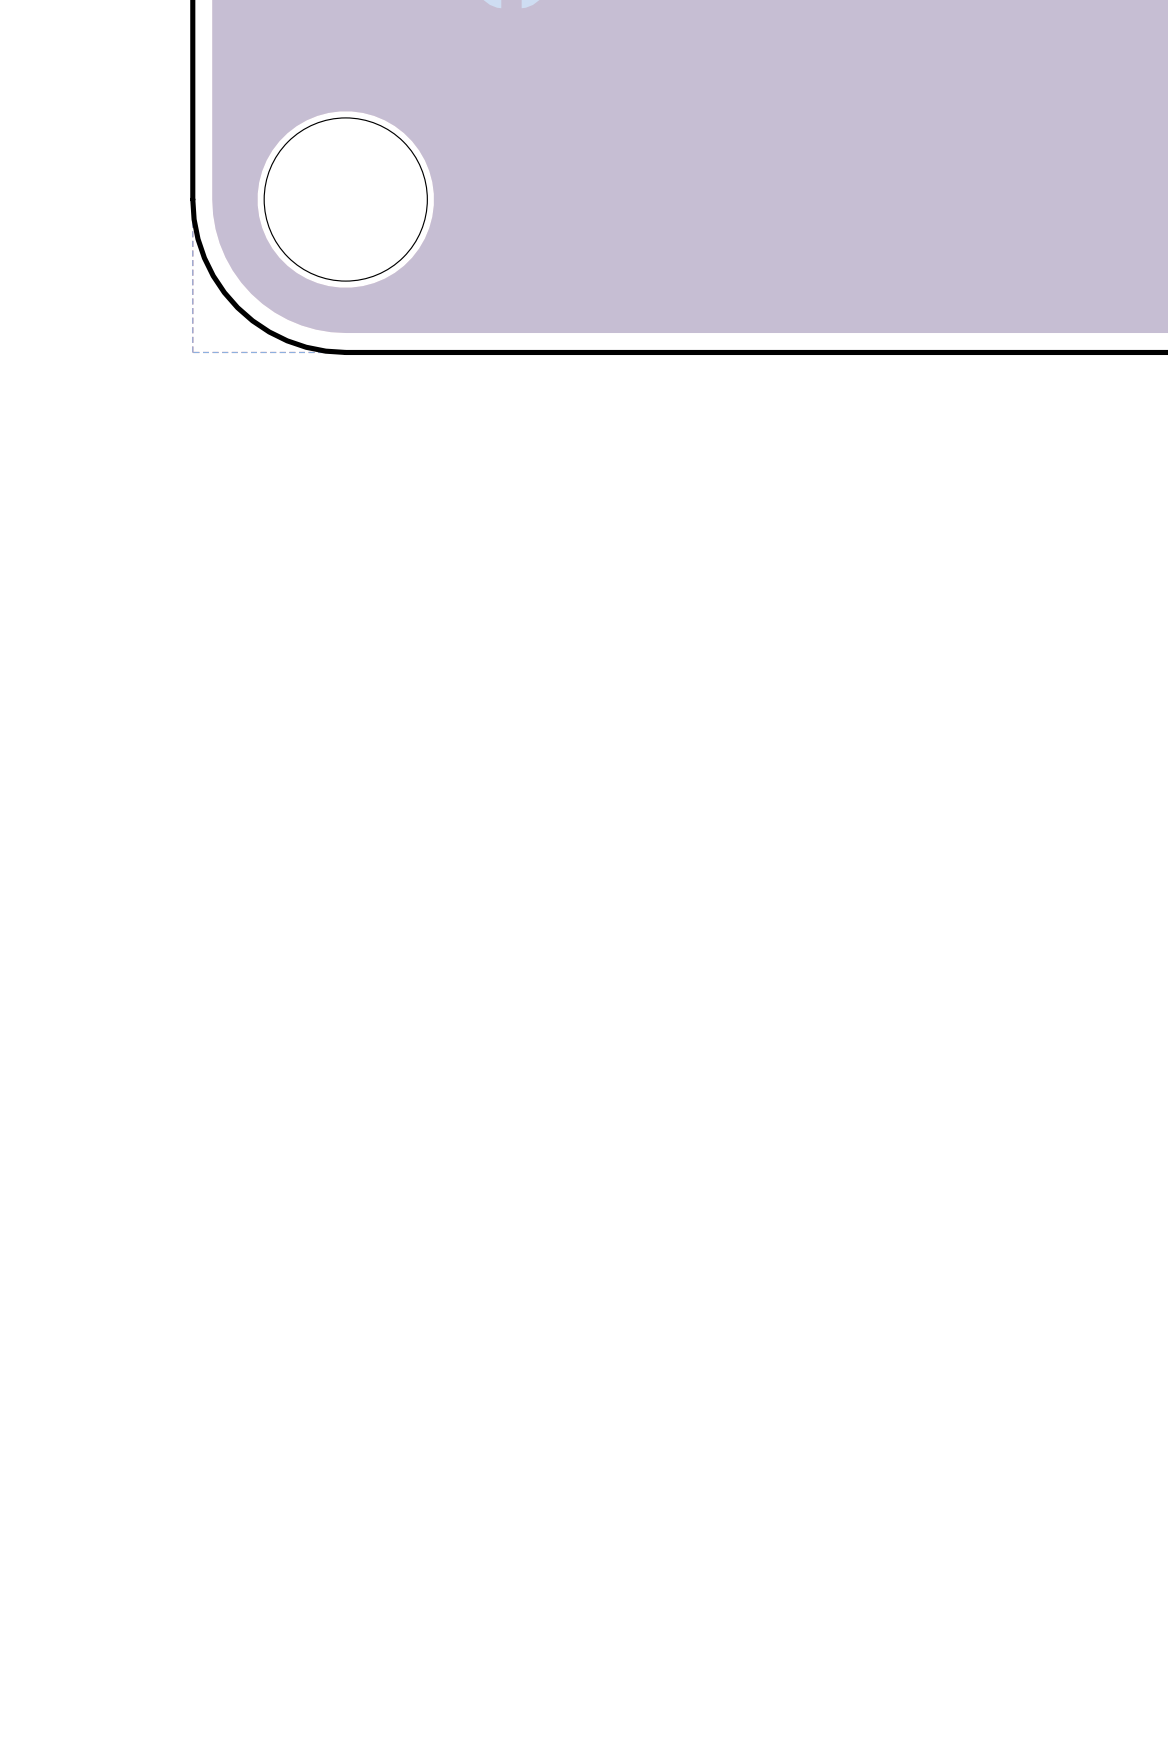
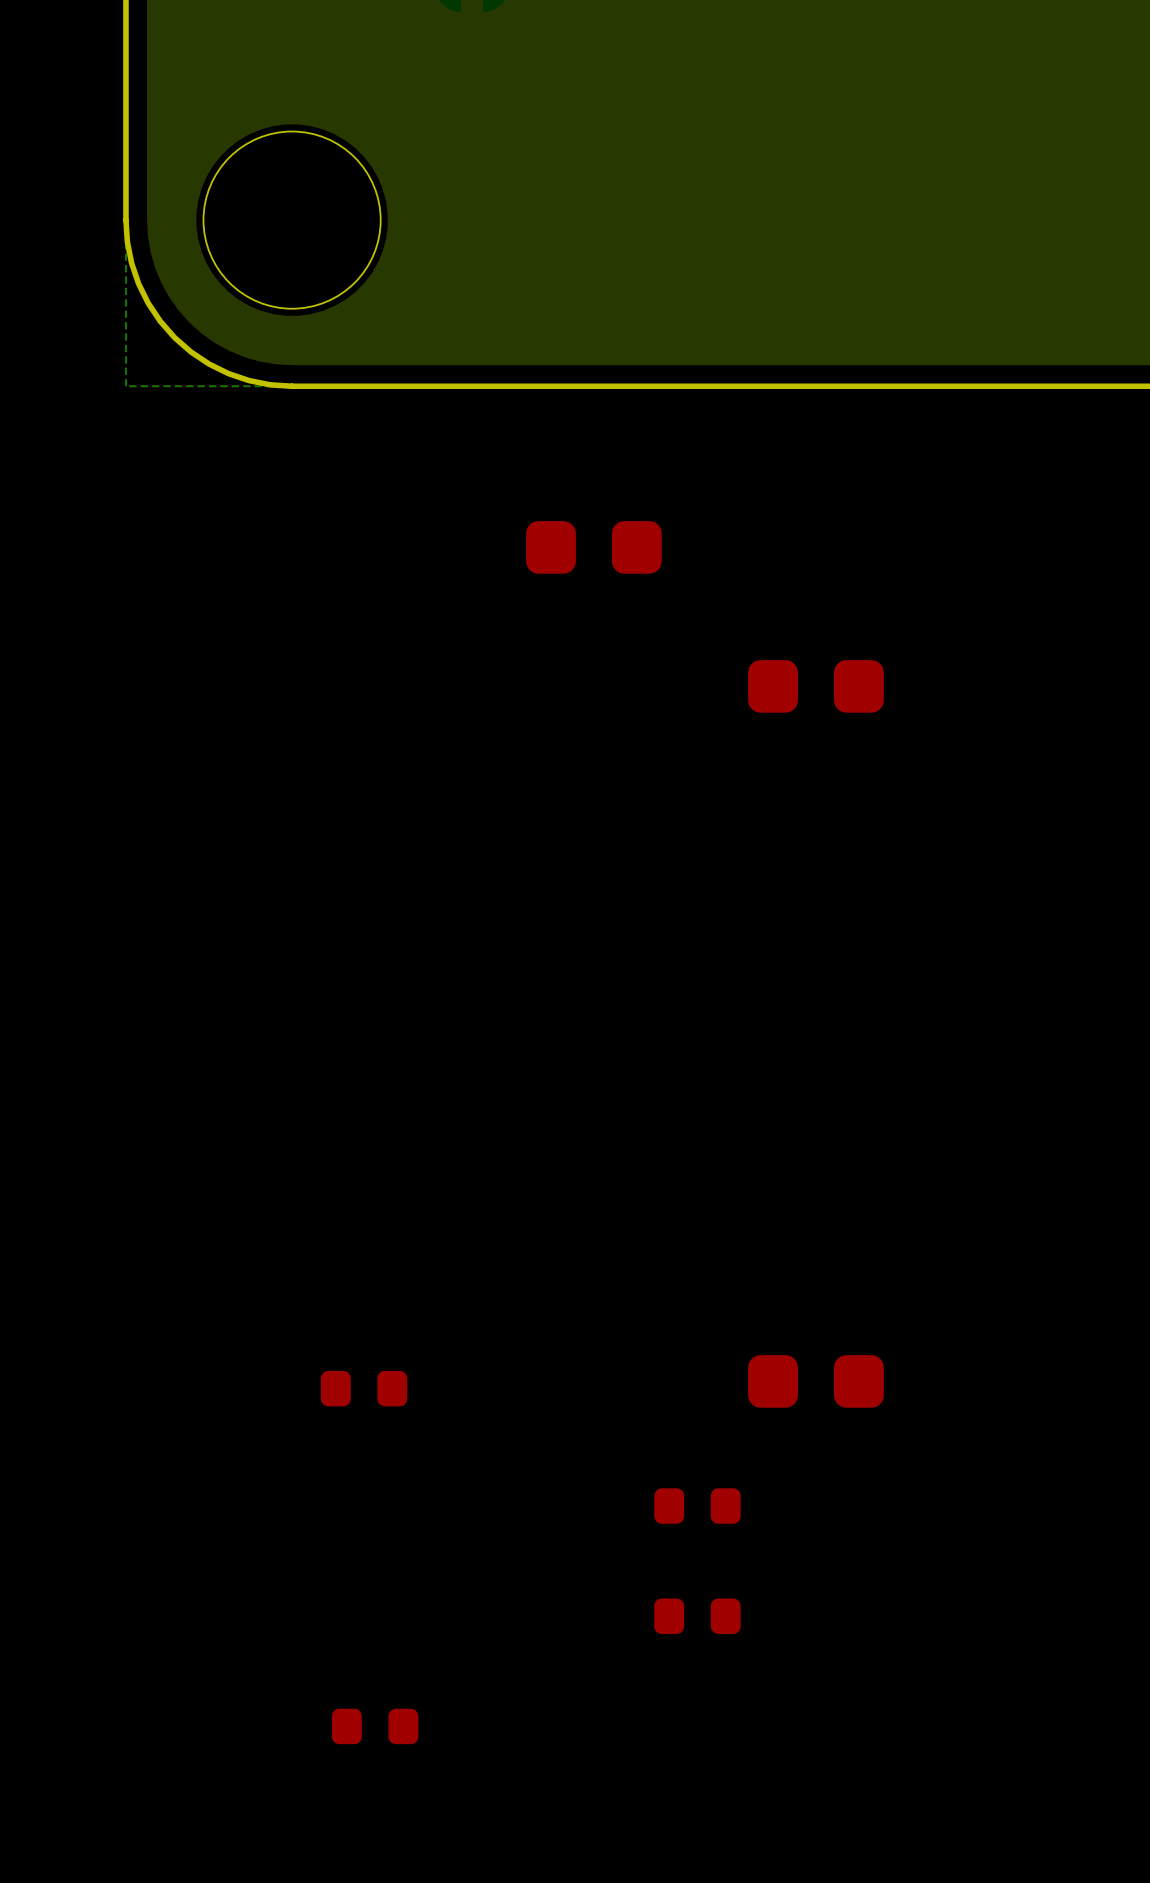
part: none -> (593, 547)
part: none -> (815, 686)
part: none -> (815, 1381)
part: none -> (364, 1388)
part: none -> (697, 1506)
part: none -> (697, 1616)
part: none -> (375, 1726)

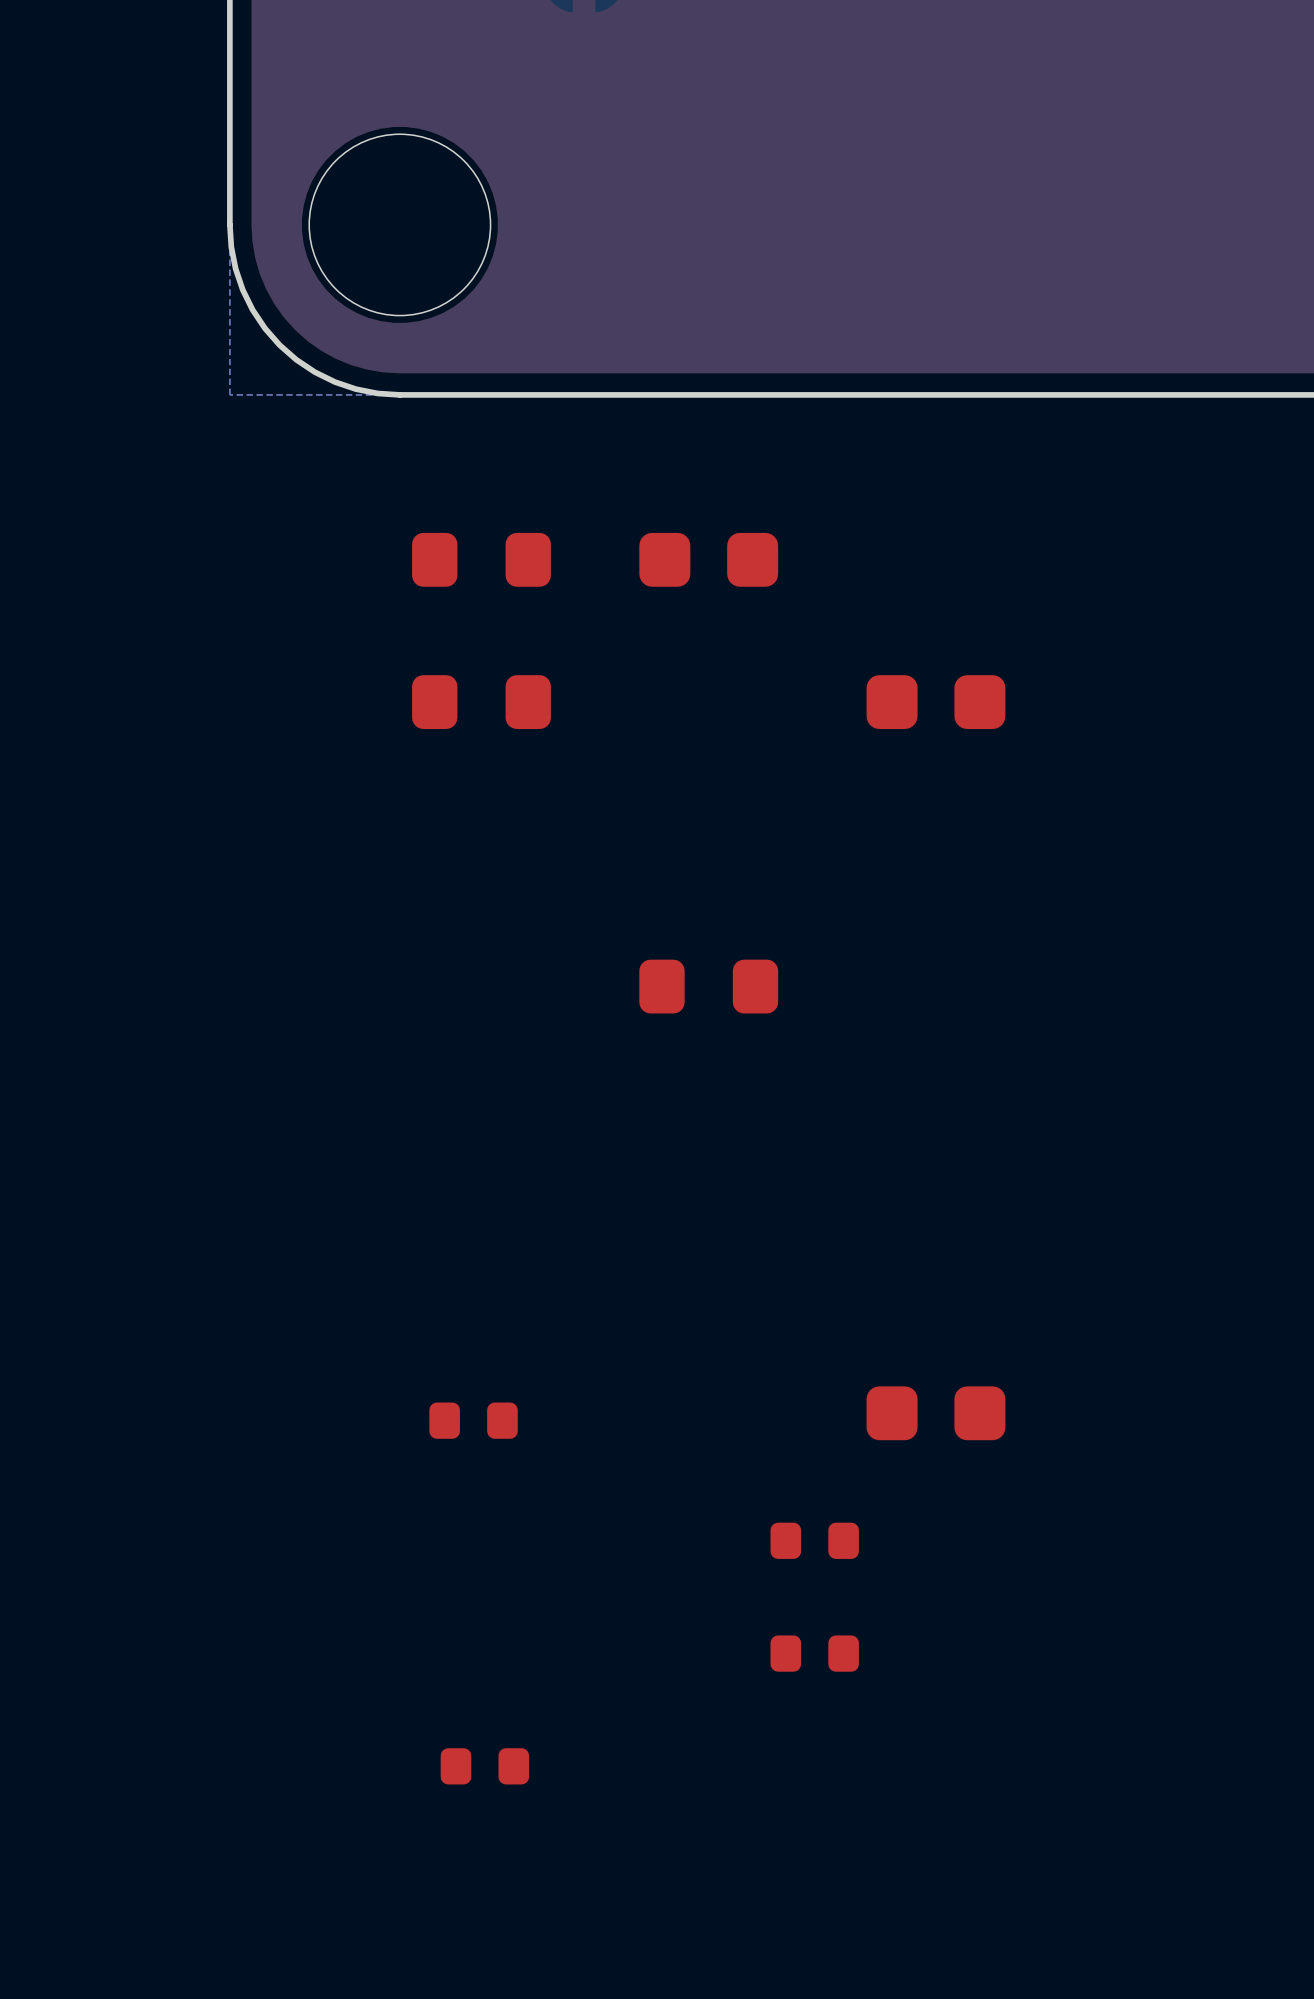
part: none -> (481, 559)
part: none -> (481, 702)
part: none -> (708, 986)

